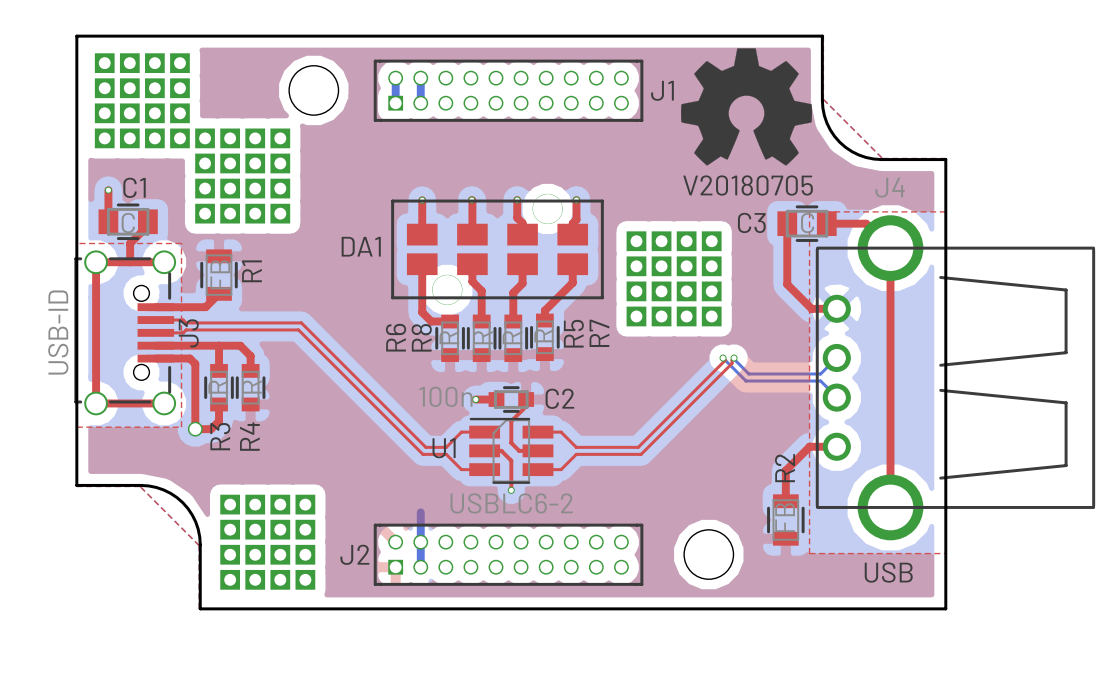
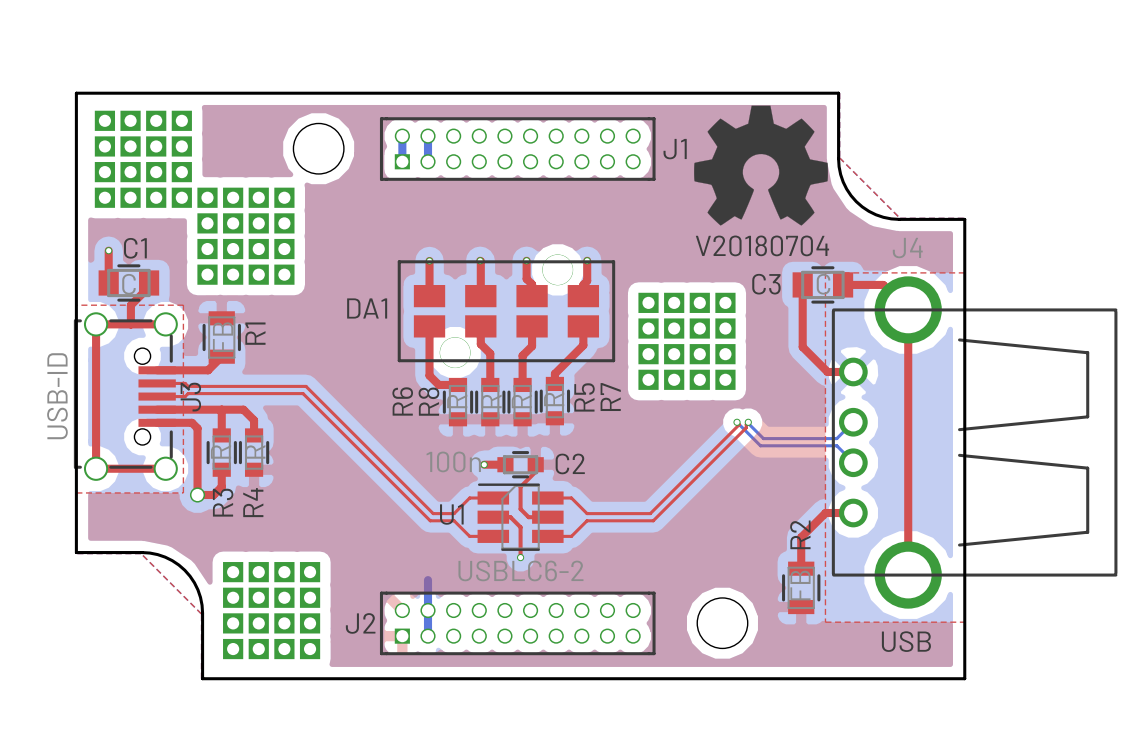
drawing shape: [683, 175, 813, 196] -> [695, 235, 830, 257]

